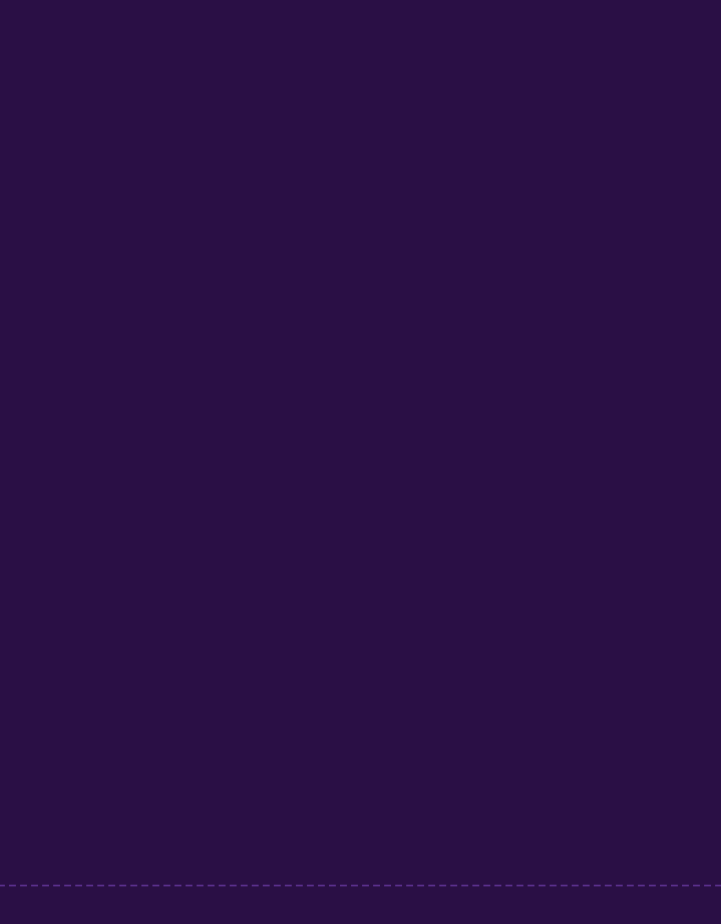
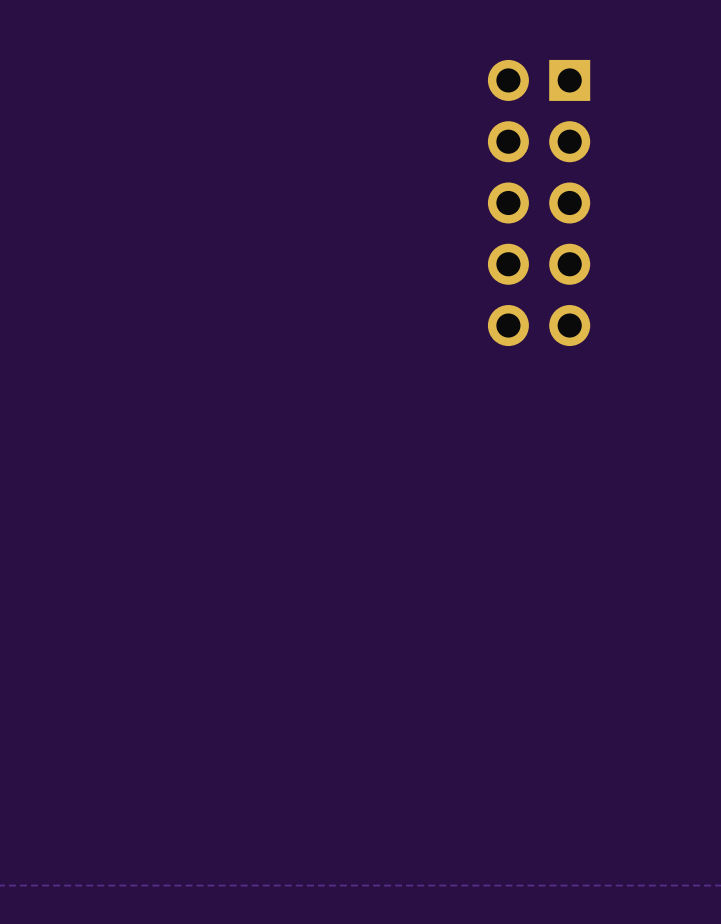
part: none -> (539, 202)

